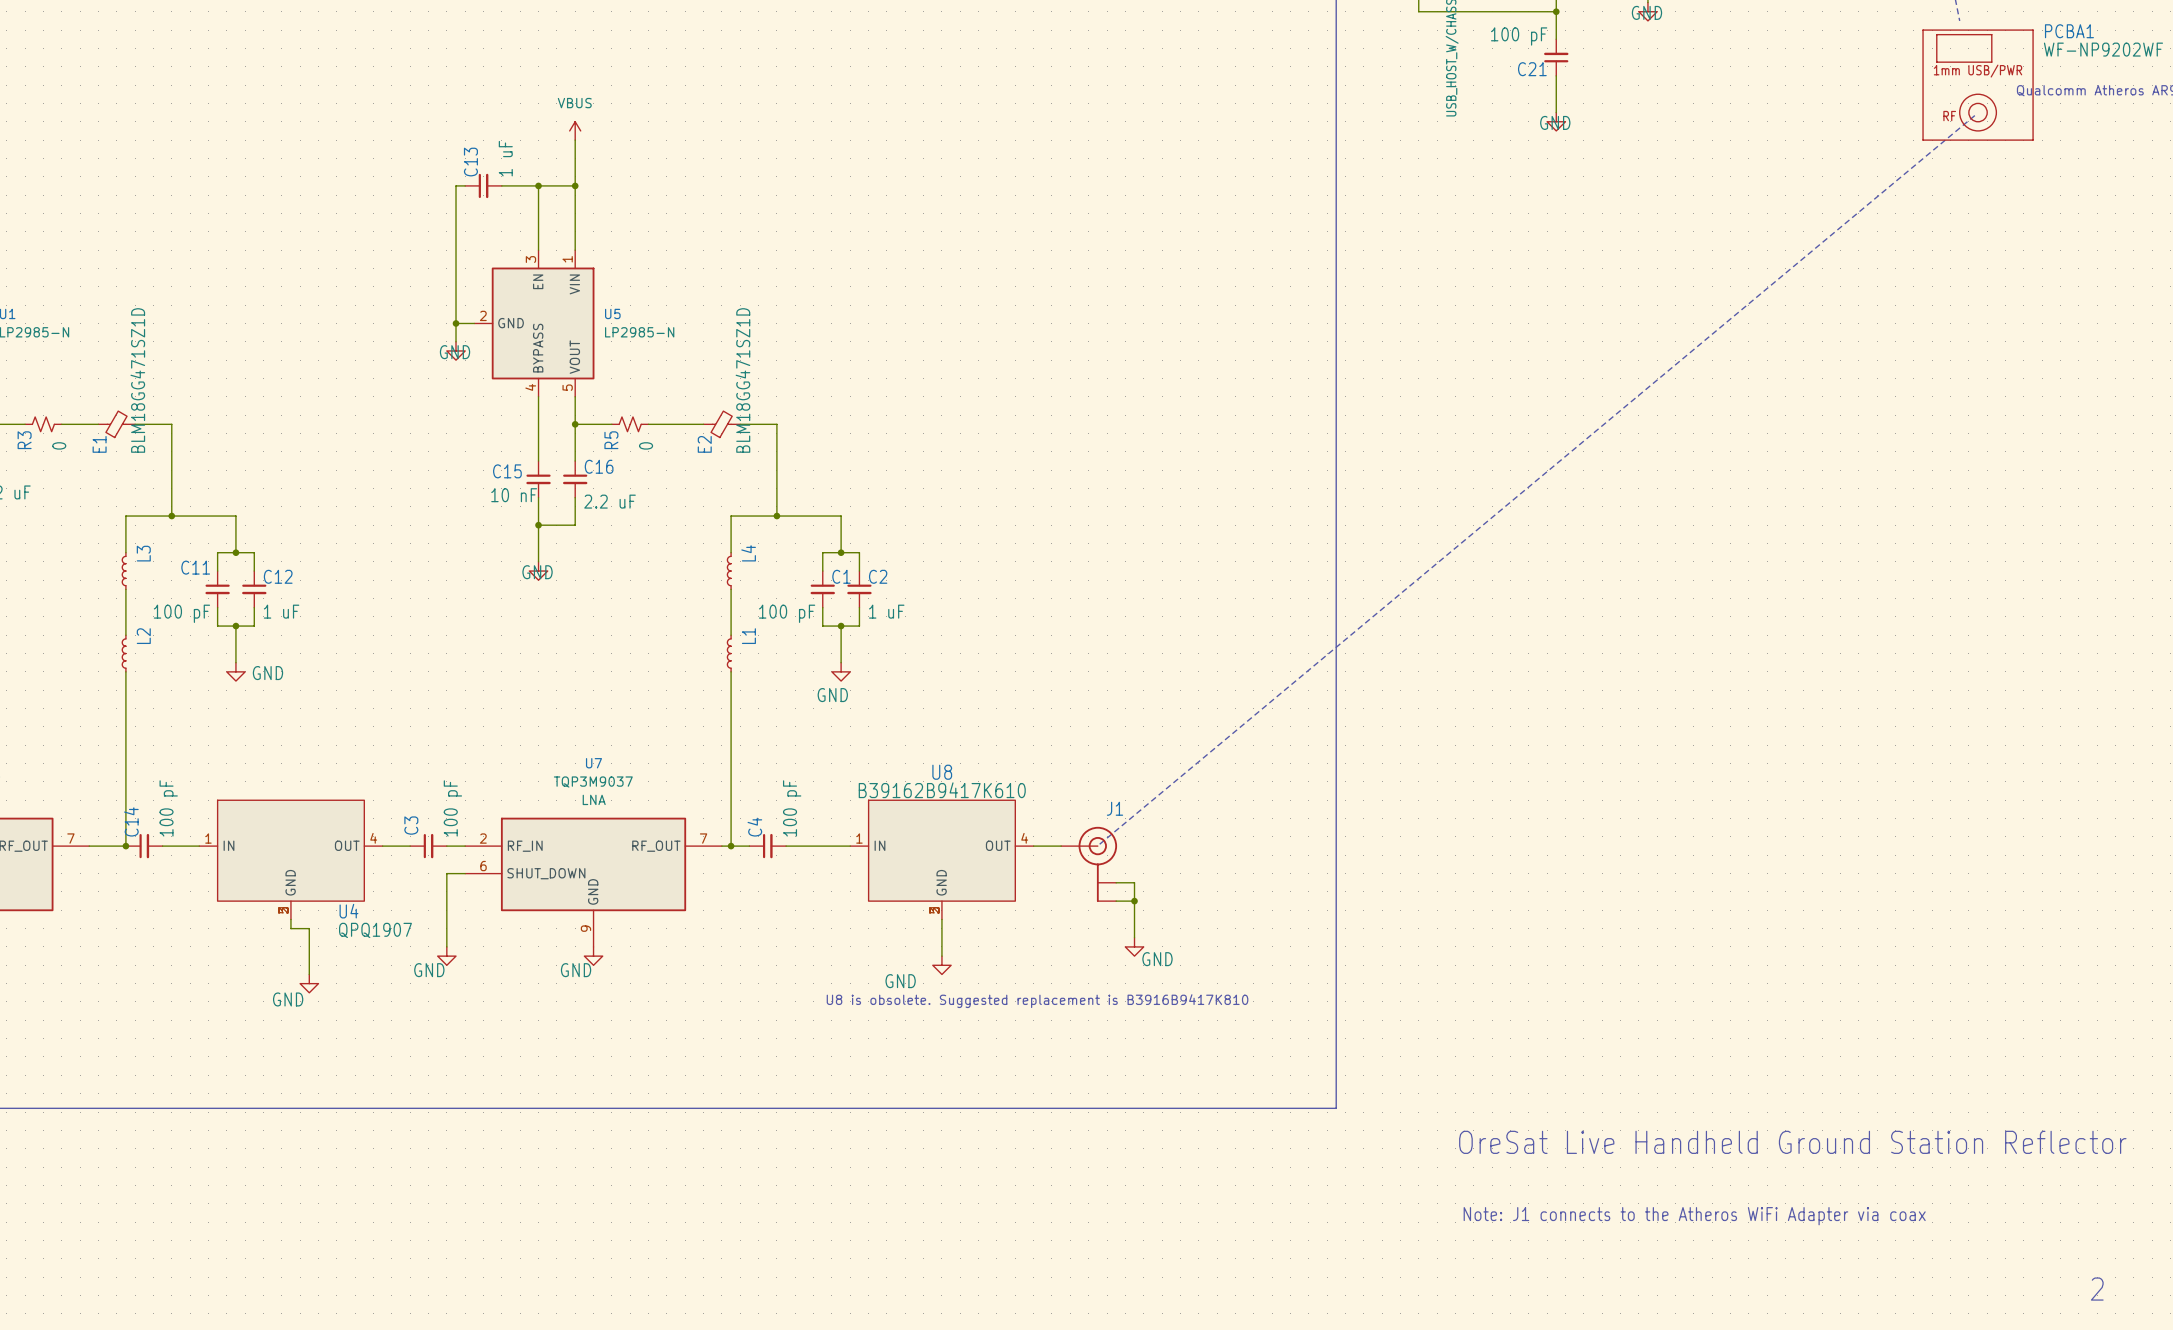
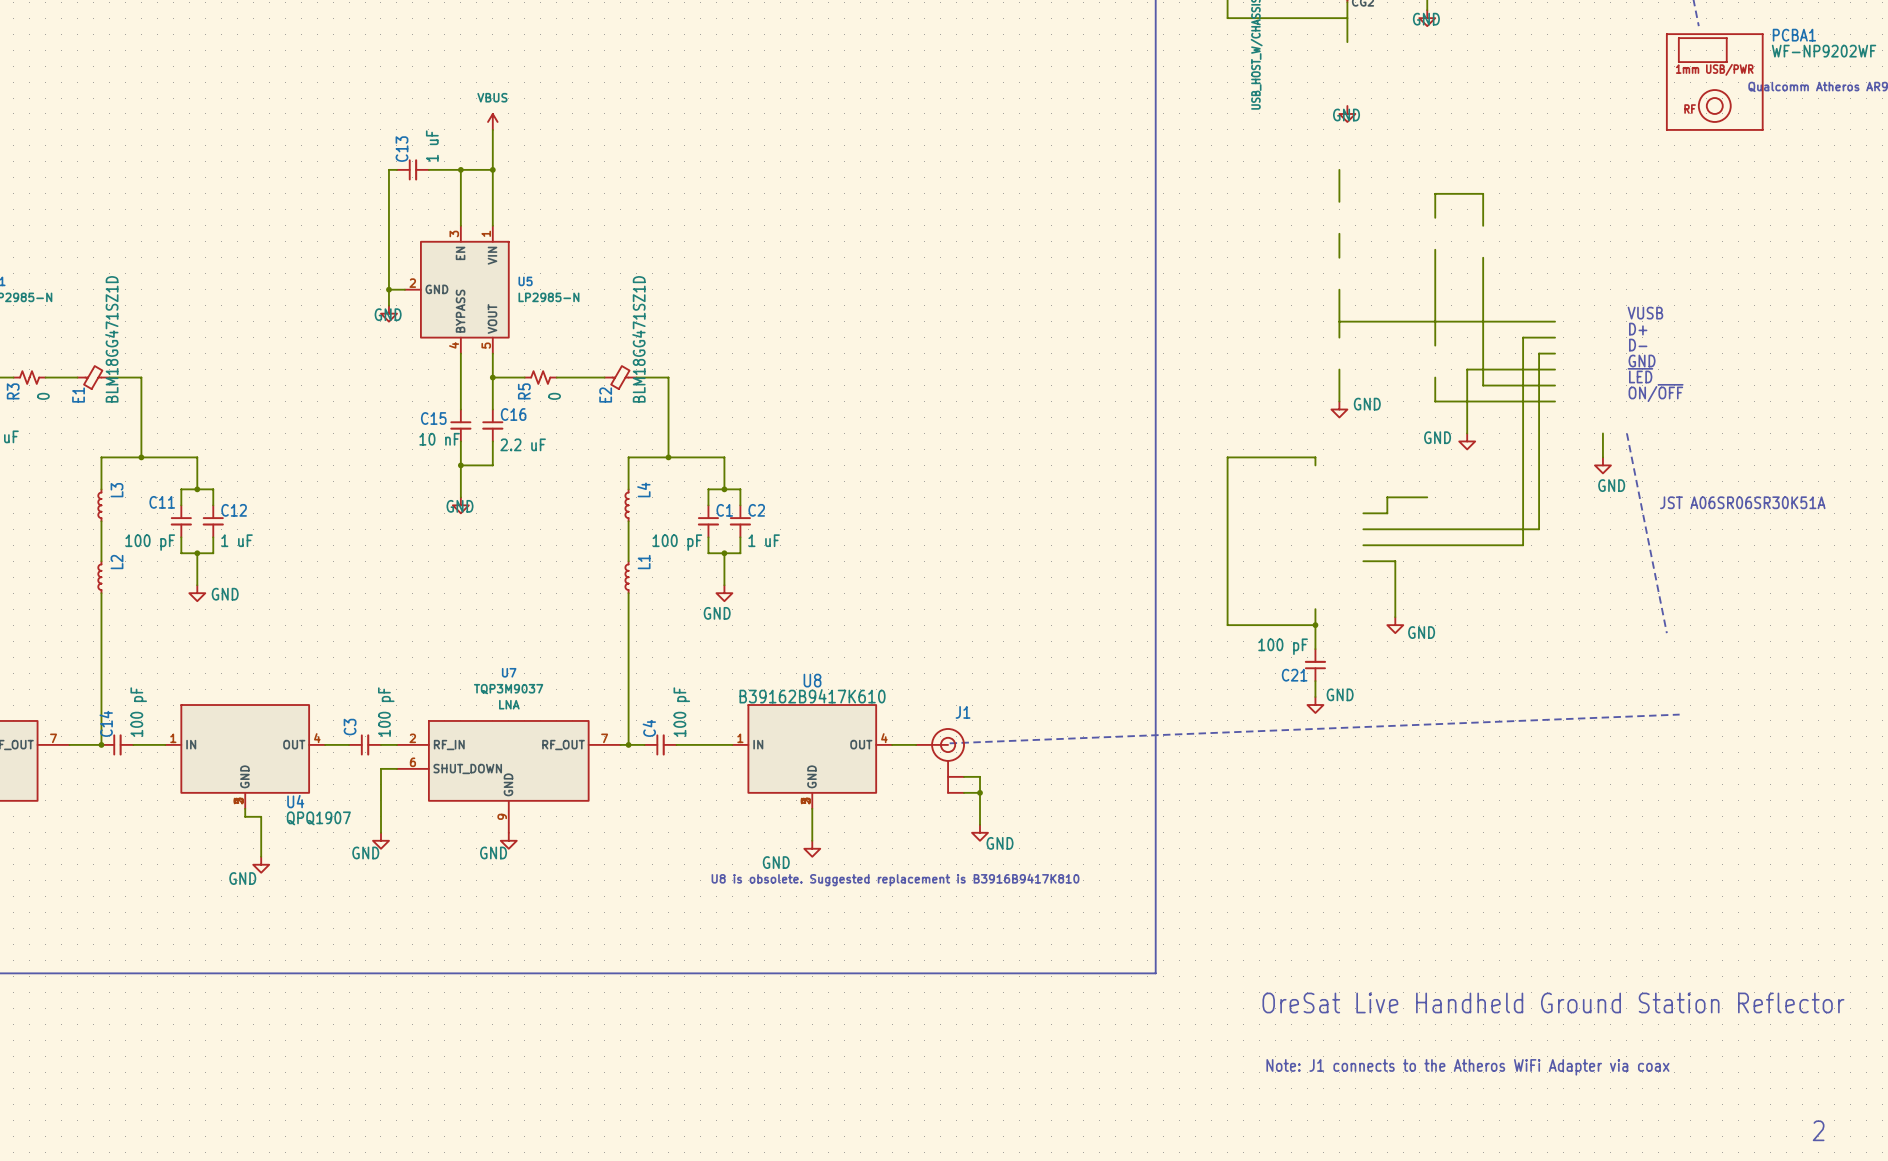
junction: (1556, 11) -> none
C21 position: (1556, 57) -> (1315, 665)
wire: (1556, 75) (1556, 112) -> (1339, 169) (1339, 201)
line: (1976, 114) (1099, 844) -> (1679, 714) (949, 743)
wire: none -> (1435, 217) (1435, 193) (1483, 193) (1483, 225)
wire: none -> (1339, 233) (1339, 257)
wire: none -> (1435, 249) (1435, 345)
wire: none -> (1483, 257) (1483, 385) (1555, 385)
wire: none -> (1339, 289) (1339, 337)
text: none -> VUSB (1645, 313)
wire: none -> (1339, 321) (1555, 321)
text: none -> D+ (1638, 329)
wire: none -> (1555, 337) (1523, 337) (1523, 545) (1363, 545)
text: none -> D- (1638, 345)
wire: none -> (1555, 353) (1539, 353) (1539, 529) (1363, 529)
text: none -> GND (1642, 361)
wire: none -> (1339, 369) (1339, 401)
wire: none -> (1555, 369) (1467, 369) (1467, 433)
text: none -> ~{LED} (1640, 375)
wire: none -> (1435, 377) (1435, 401) (1555, 401)
text: none -> ON/~{OFF} (1656, 393)
power symbol: none -> GND (1339, 409)
wire: none -> (1602, 433) (1602, 457)
line: none -> (1626, 433) (1666, 633)
power symbol: none -> GND (1467, 441)
wire: none -> (1315, 465) (1315, 457) (1227, 457) (1227, 625) (1315, 625)
power symbol: none -> GND (1602, 465)
wire: none -> (1427, 497) (1387, 497) (1387, 513) (1363, 513)
text: none -> JST A06SR06SR30K51A (1742, 502)
wire: none -> (1363, 561) (1395, 561) (1395, 617)
wire: none -> (1315, 609) (1315, 649)
junction: none -> (1315, 625)
power symbol: none -> GND (1395, 625)
wire: none -> (1315, 681) (1315, 697)
power symbol: none -> GND (1315, 705)

